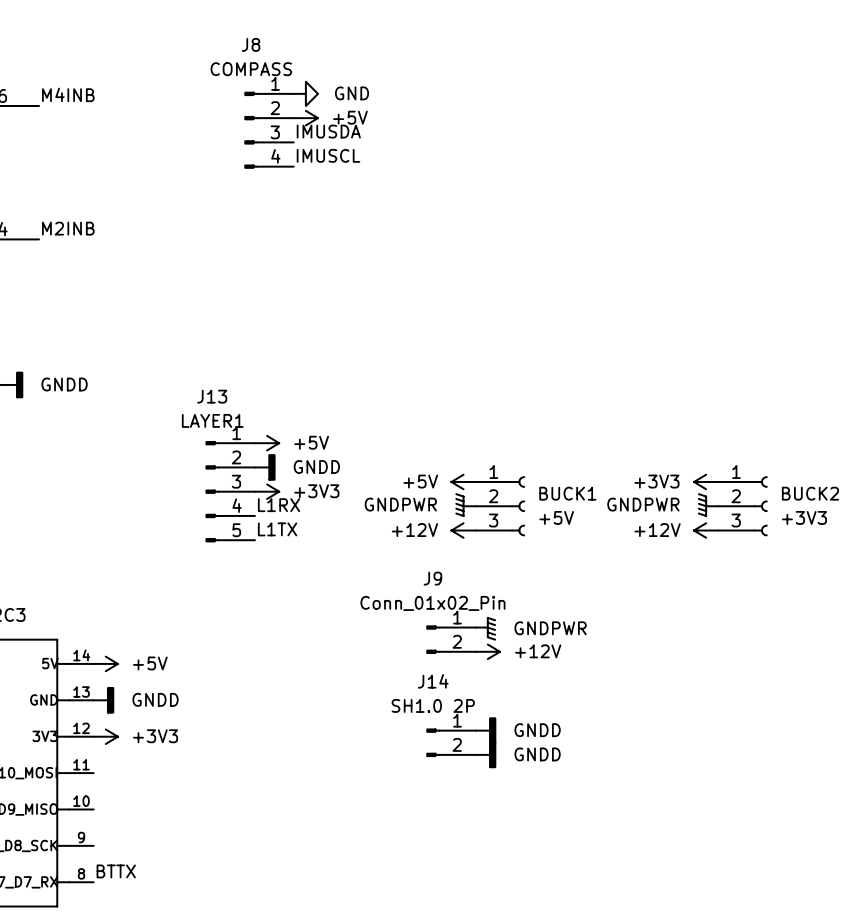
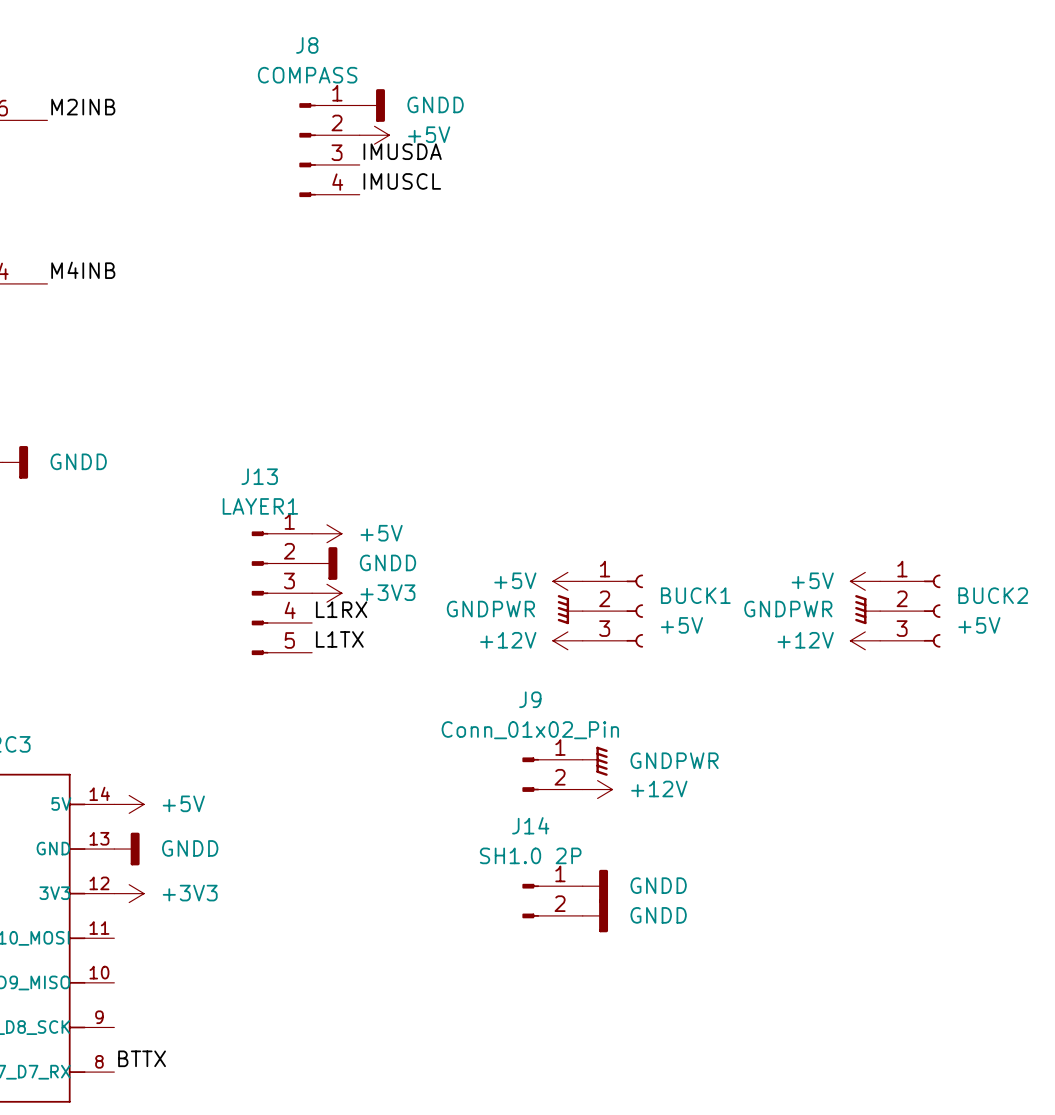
power symbol: GND (305, 93) -> GNDD (372, 105)
label: M4INB (68, 94) -> M2INB (83, 107)
label: M2INB (68, 228) -> M4INB (83, 270)
power symbol: +3V3 (706, 482) -> +5V (865, 581)
BUCK2 value: +3V3 (804, 517) -> +5V (979, 625)

